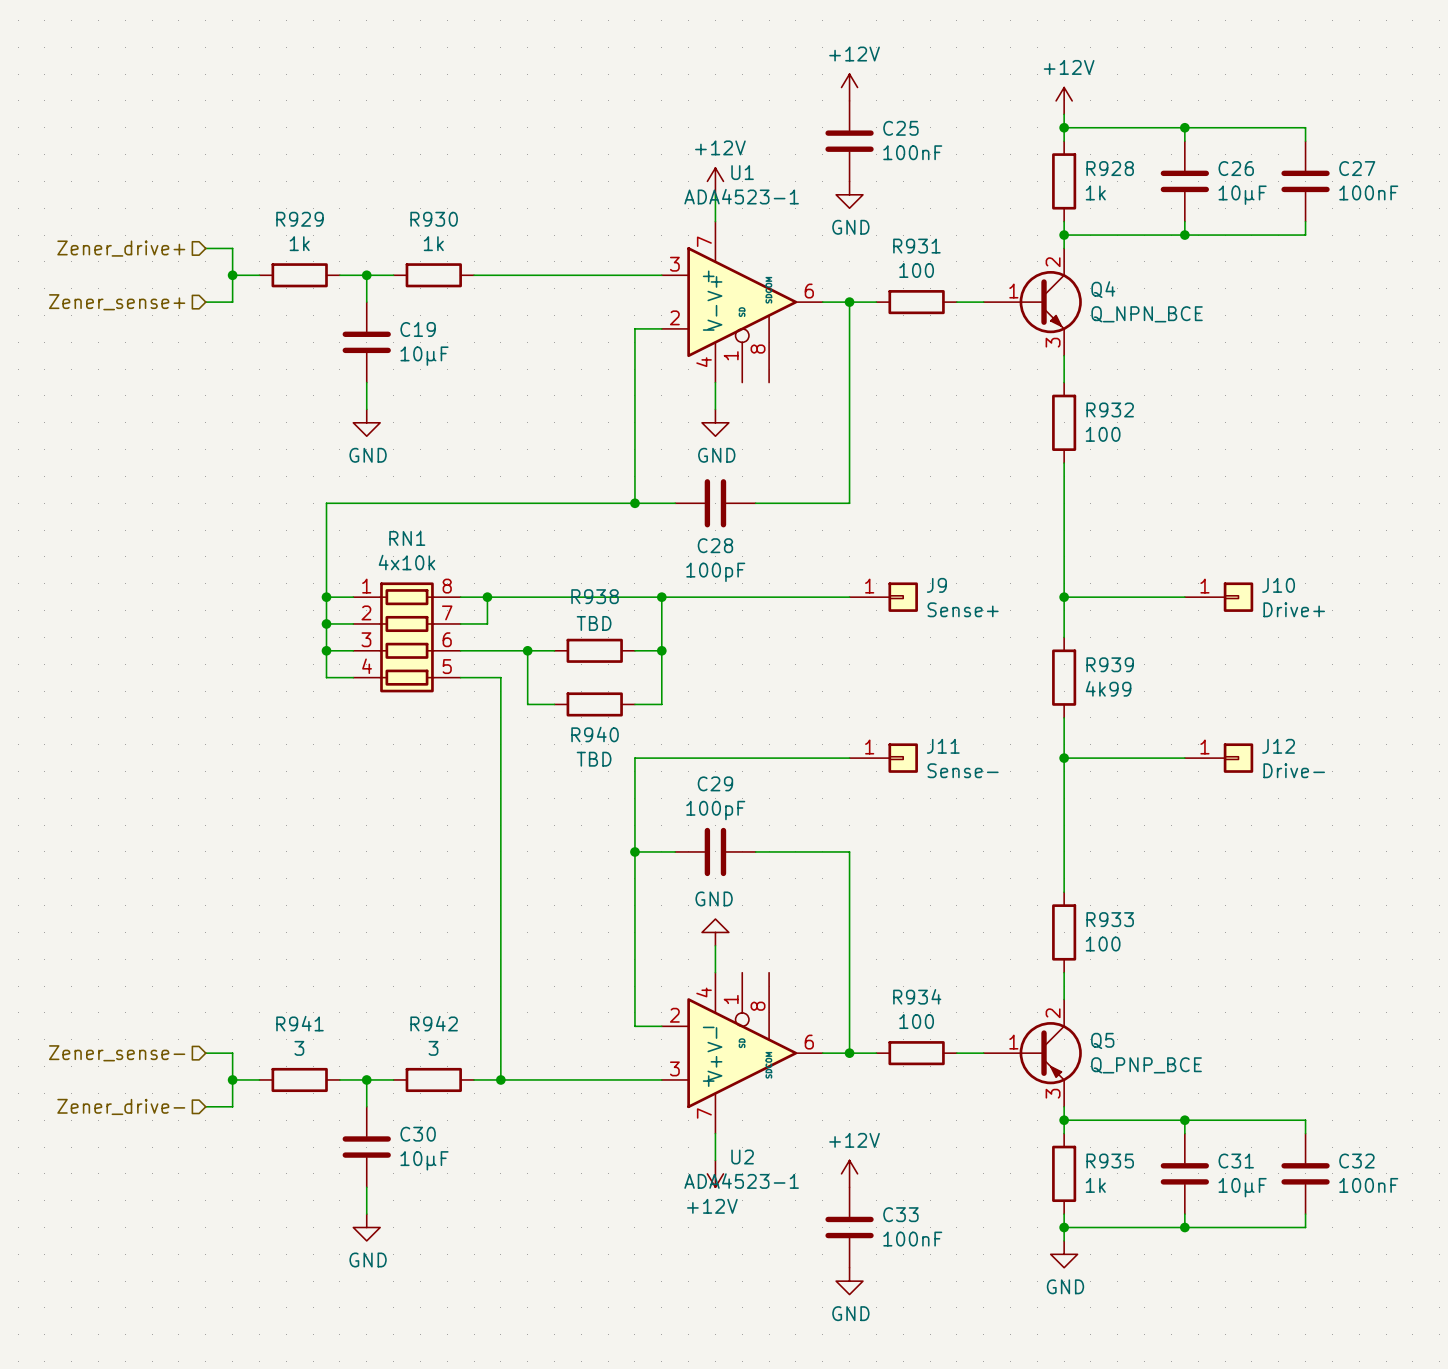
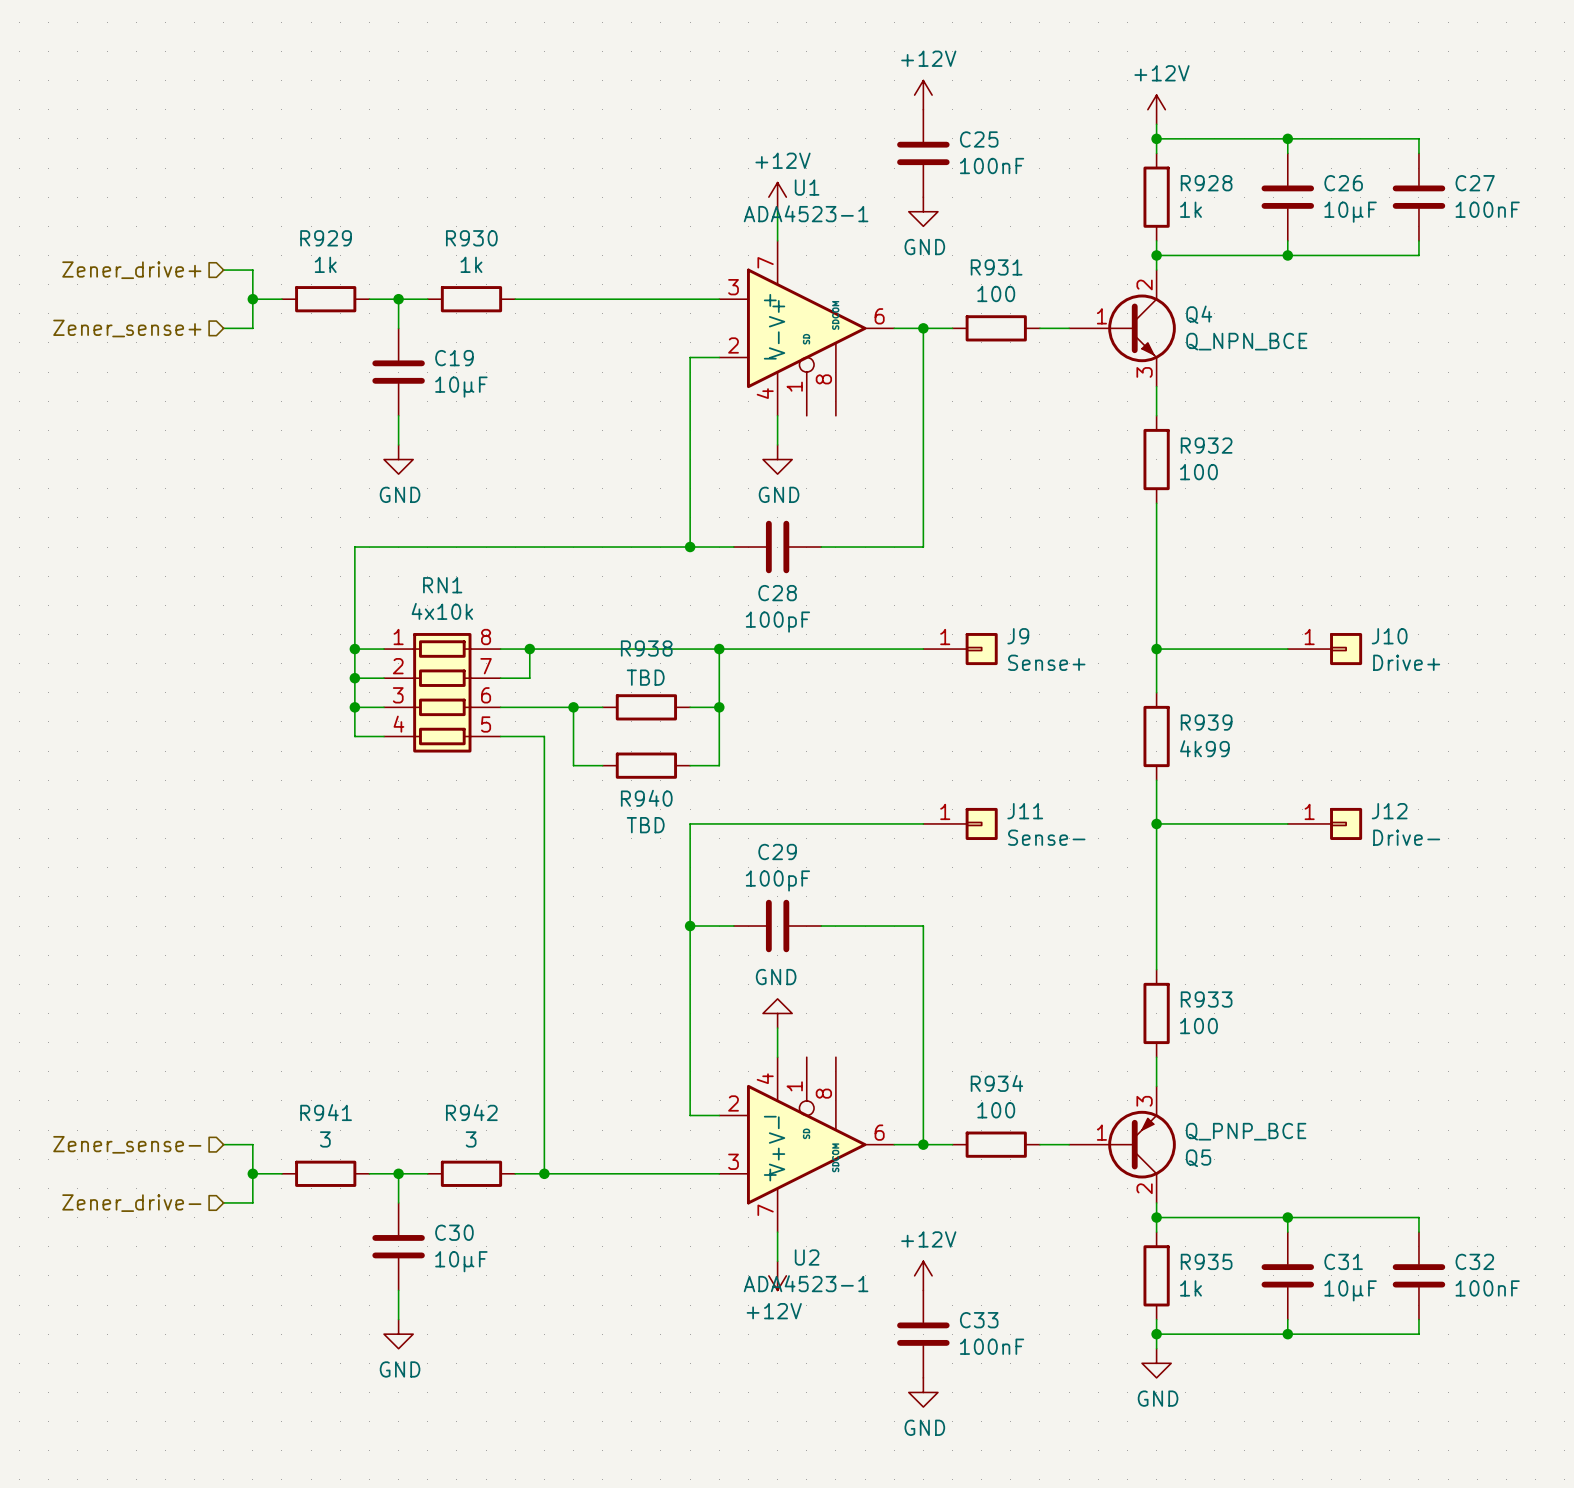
Q5 flip: as is (1050, 1053) -> up-down (1142, 1144)

